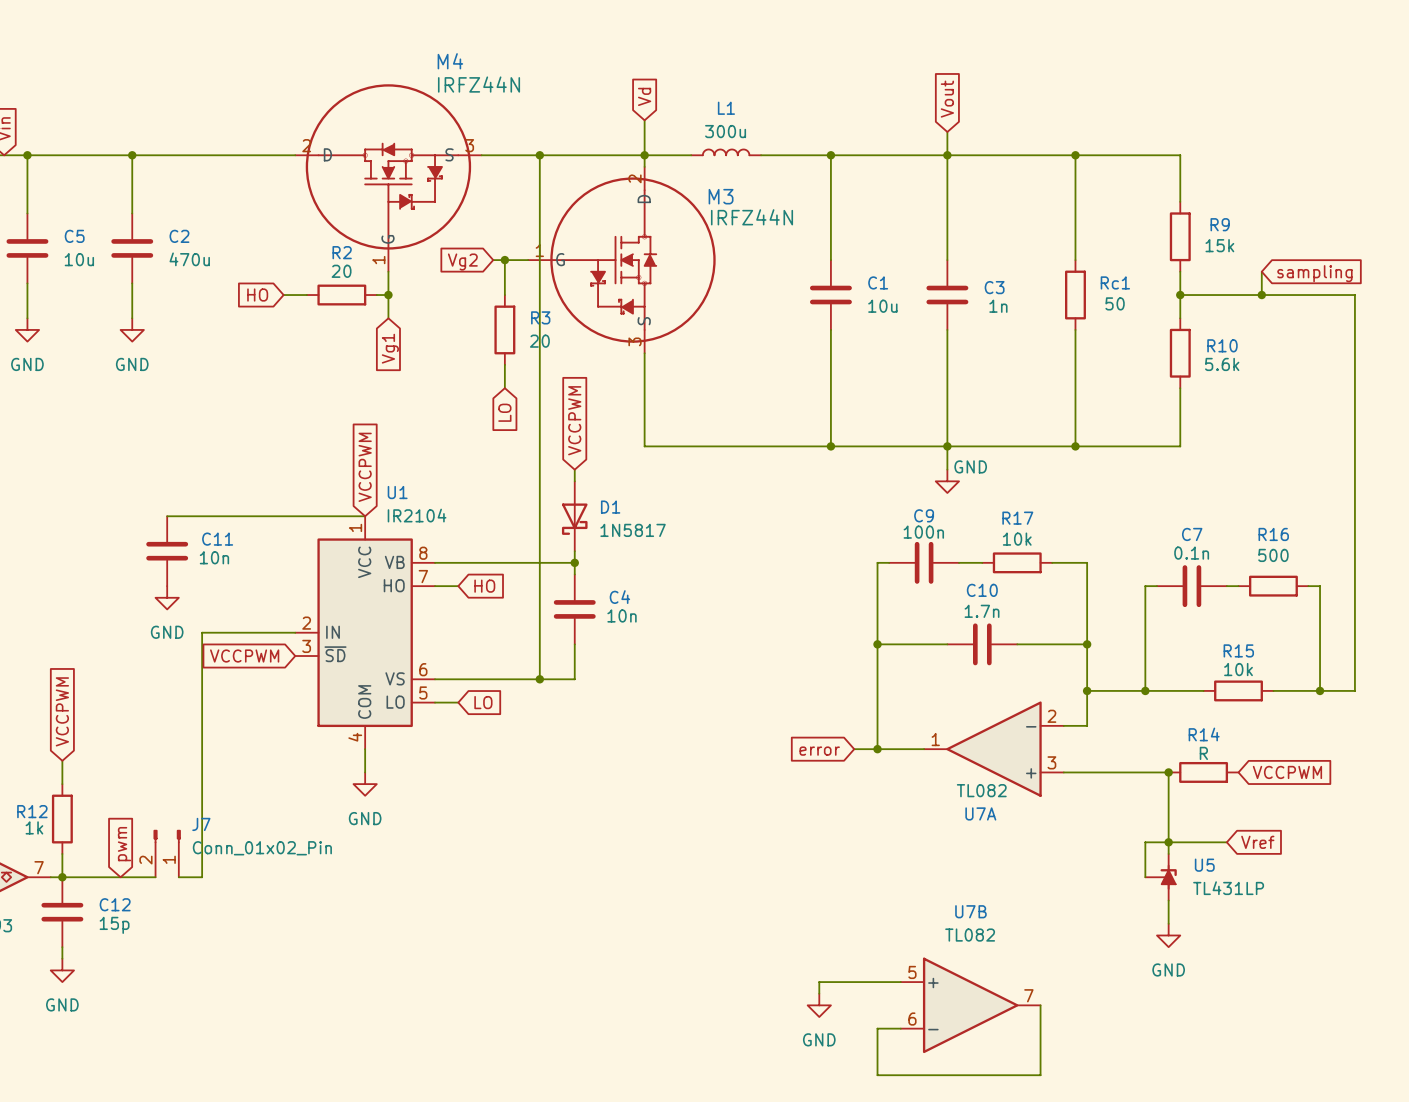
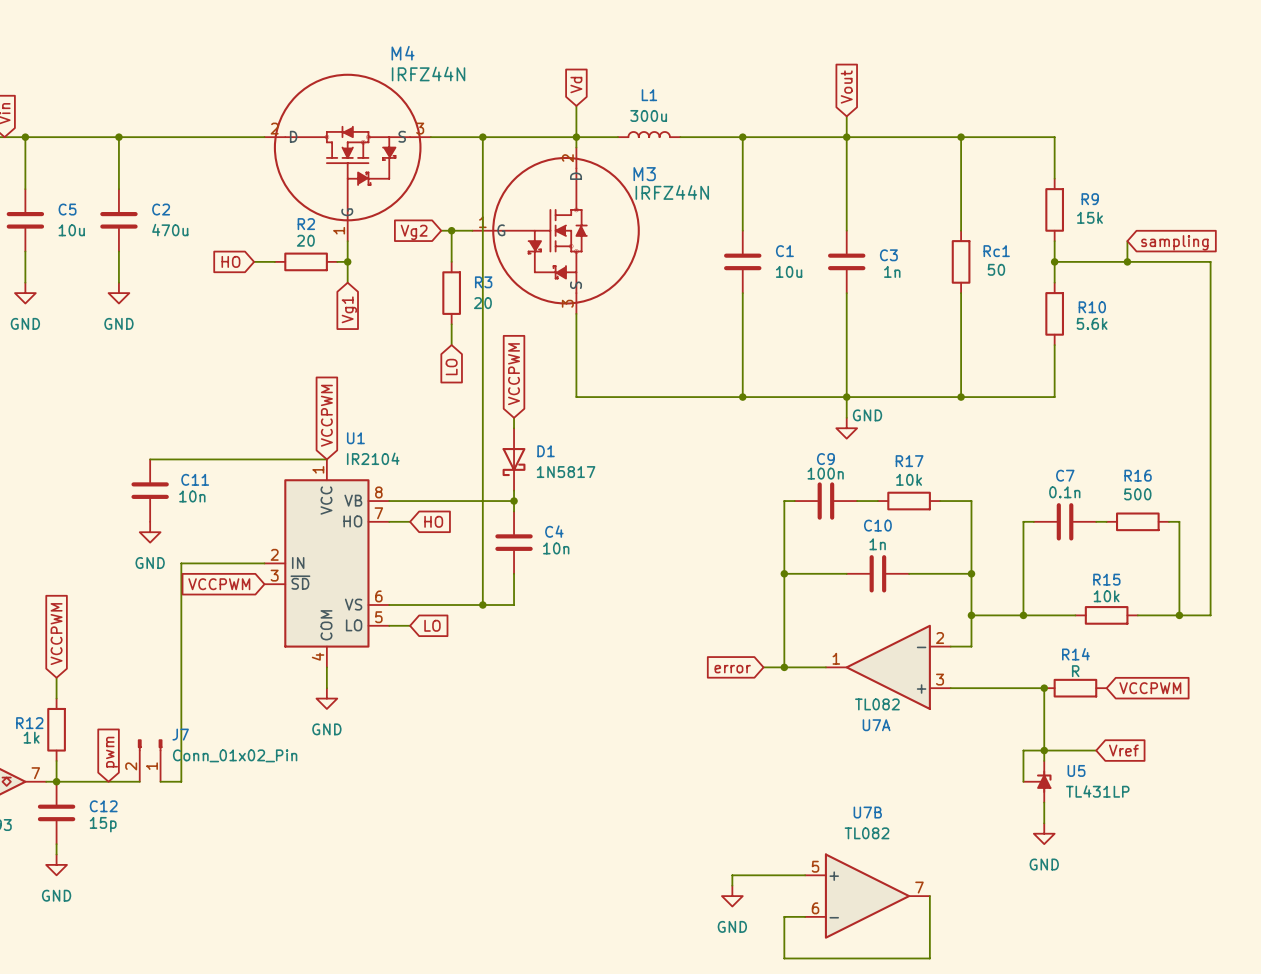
C10 value: 1.7n (982, 611) -> 1n (877, 544)

